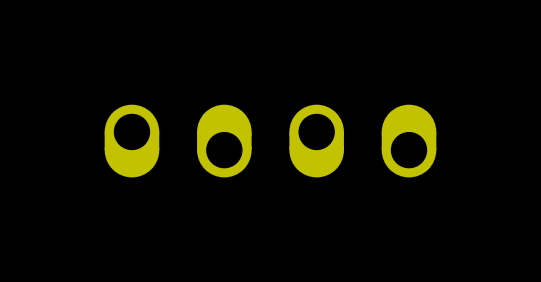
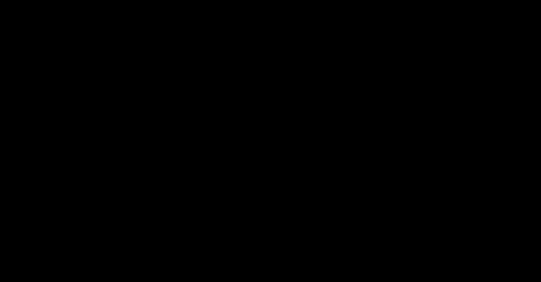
part: (270, 141) -> none

